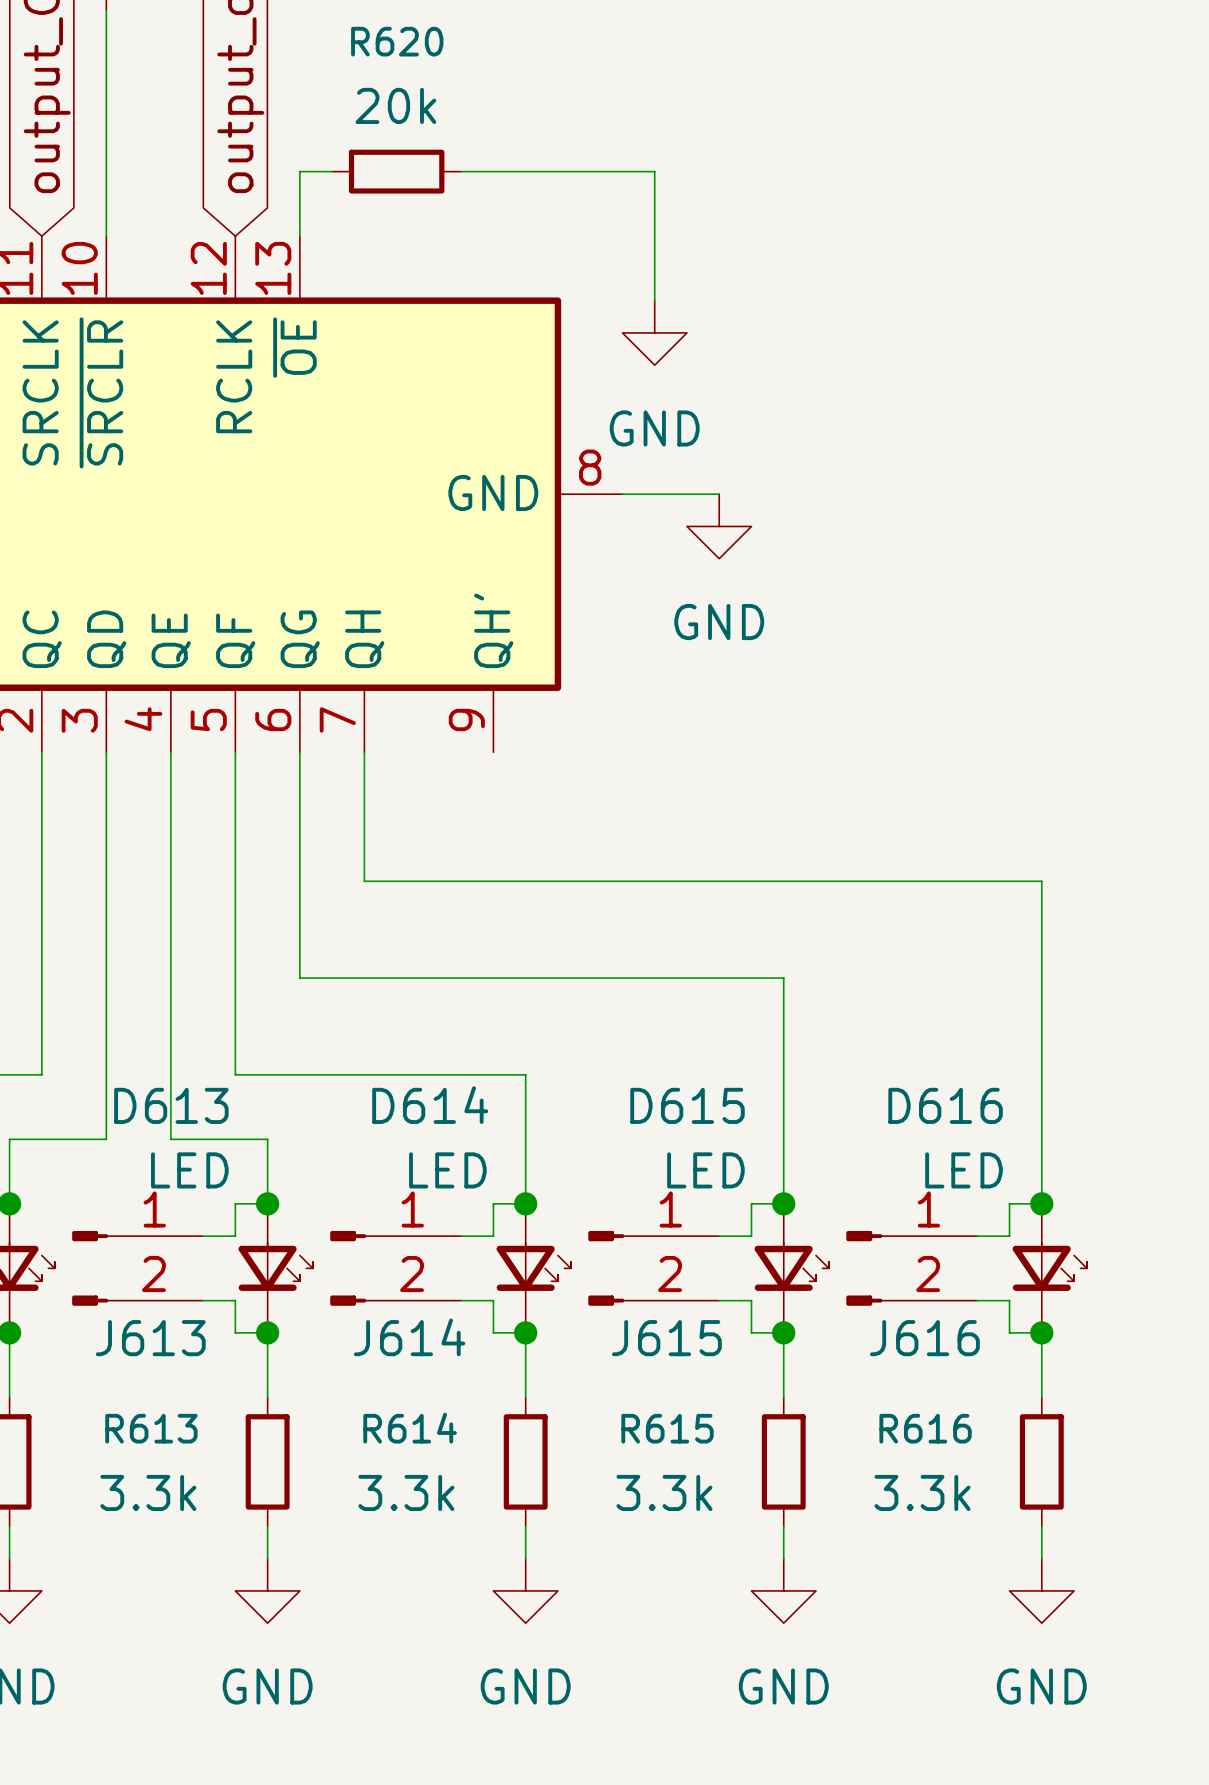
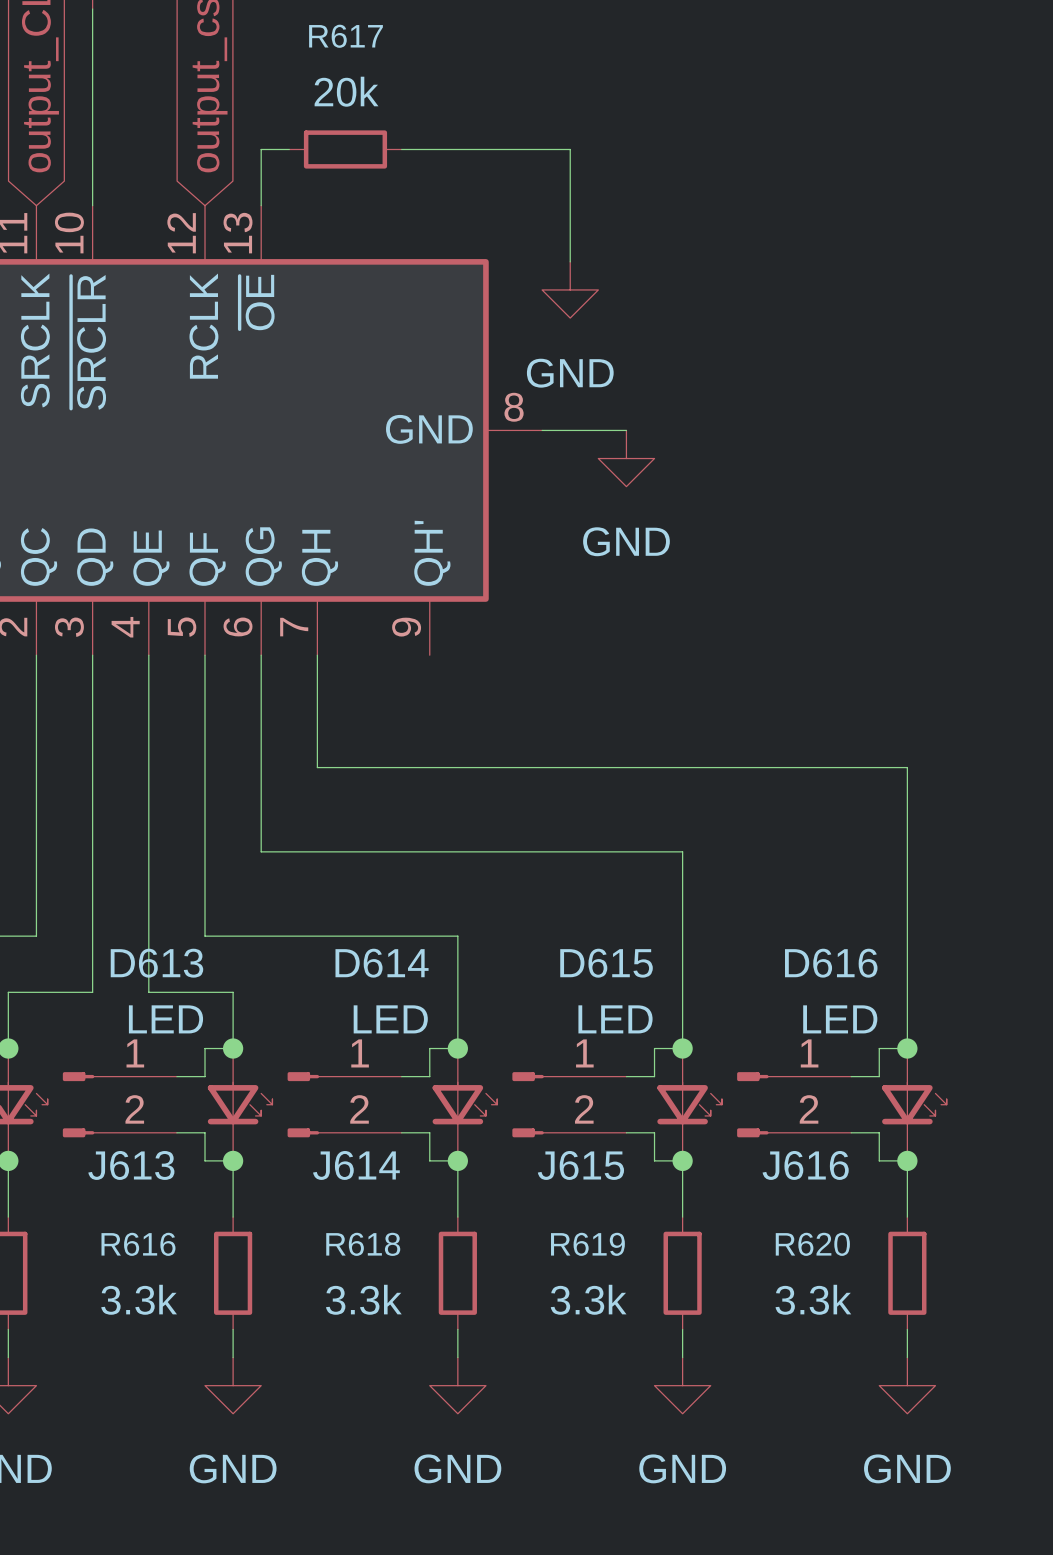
R620 name: R620 (397, 41) -> R617 (346, 36)
R613 name: R613 (151, 1428) -> R616 (138, 1244)
R614 name: R614 (410, 1428) -> R618 (363, 1244)
R615 name: R615 (667, 1428) -> R619 (587, 1244)
R616 name: R616 (925, 1428) -> R620 (812, 1244)

